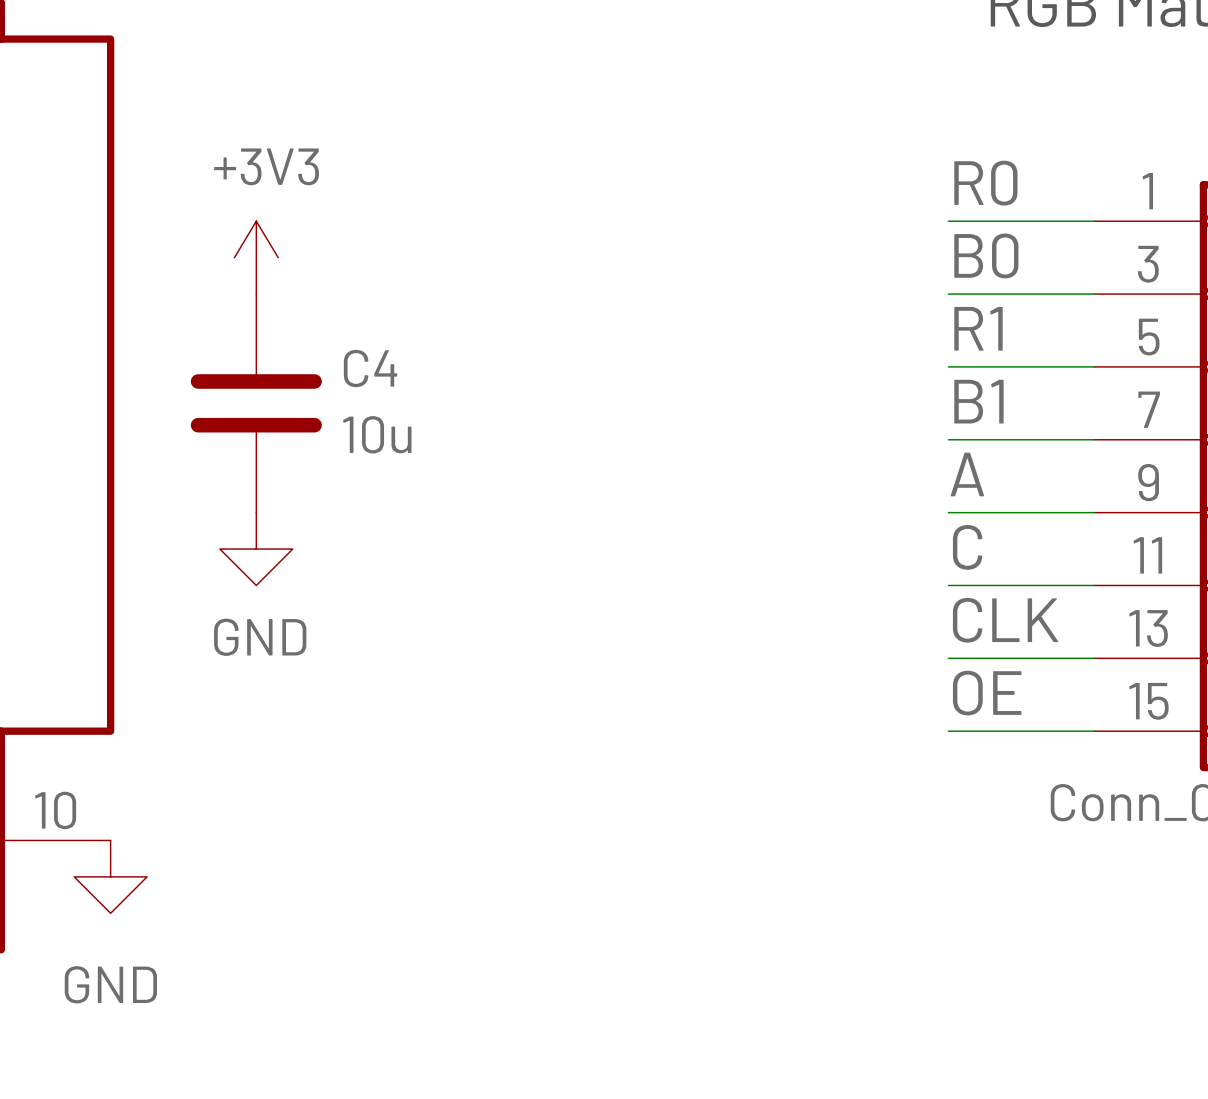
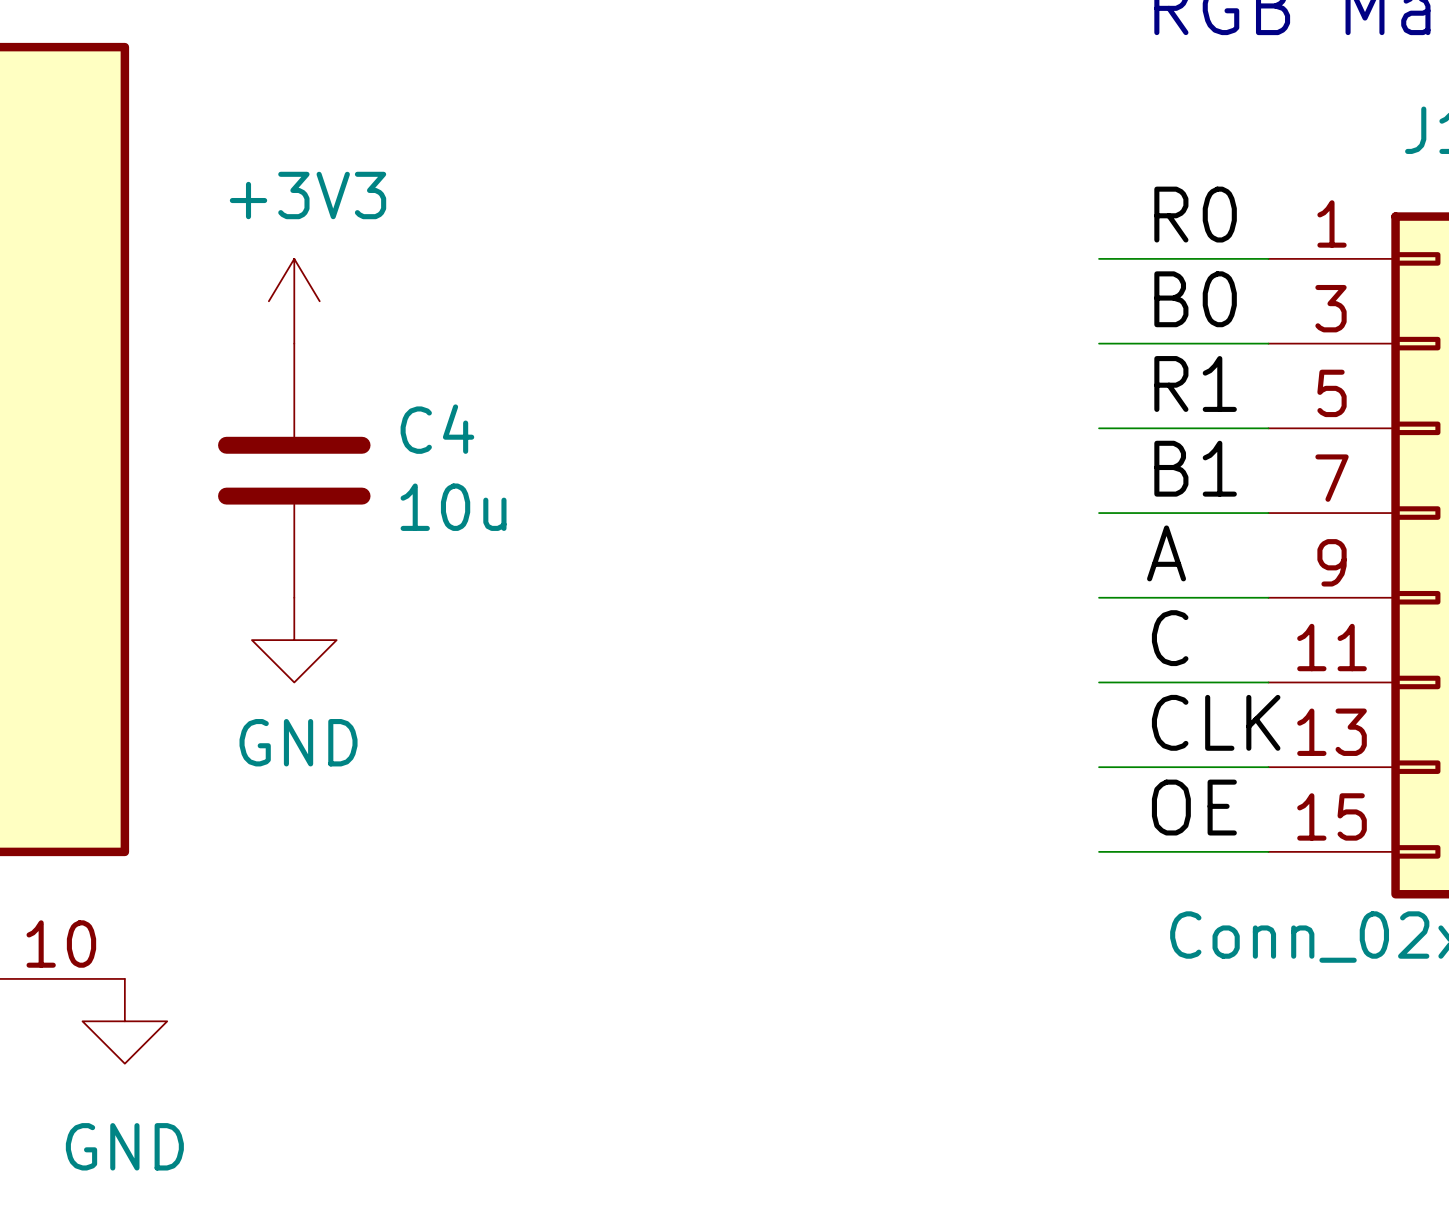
label position: R0 (985, 183) -> R0 (1195, 214)
label position: B0 (986, 255) -> B0 (1195, 299)
label position: R1 (978, 328) -> R1 (1195, 383)
label position: B1 (978, 401) -> B1 (1195, 468)
label position: A (967, 474) -> A (1166, 553)
label position: C (967, 547) -> C (1170, 638)
label position: CLK (1005, 620) -> CLK (1216, 722)
label position: OE (987, 693) -> OE (1194, 807)

